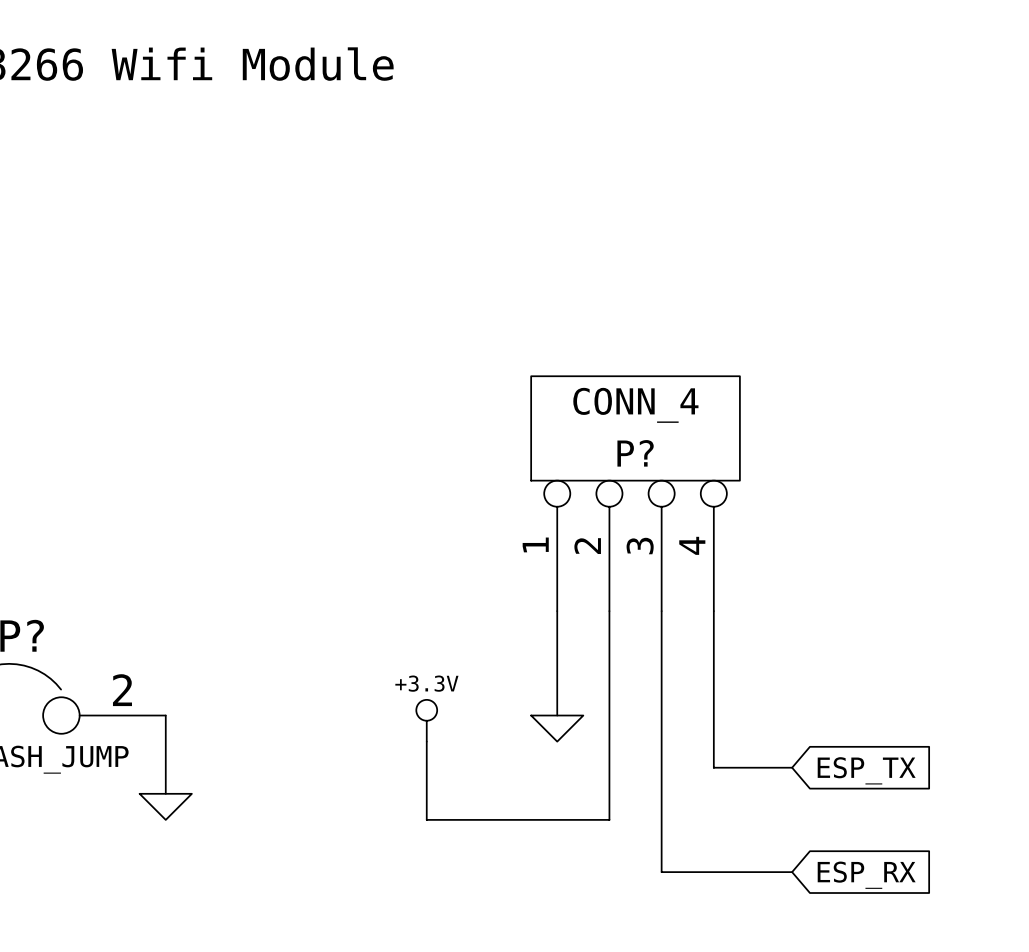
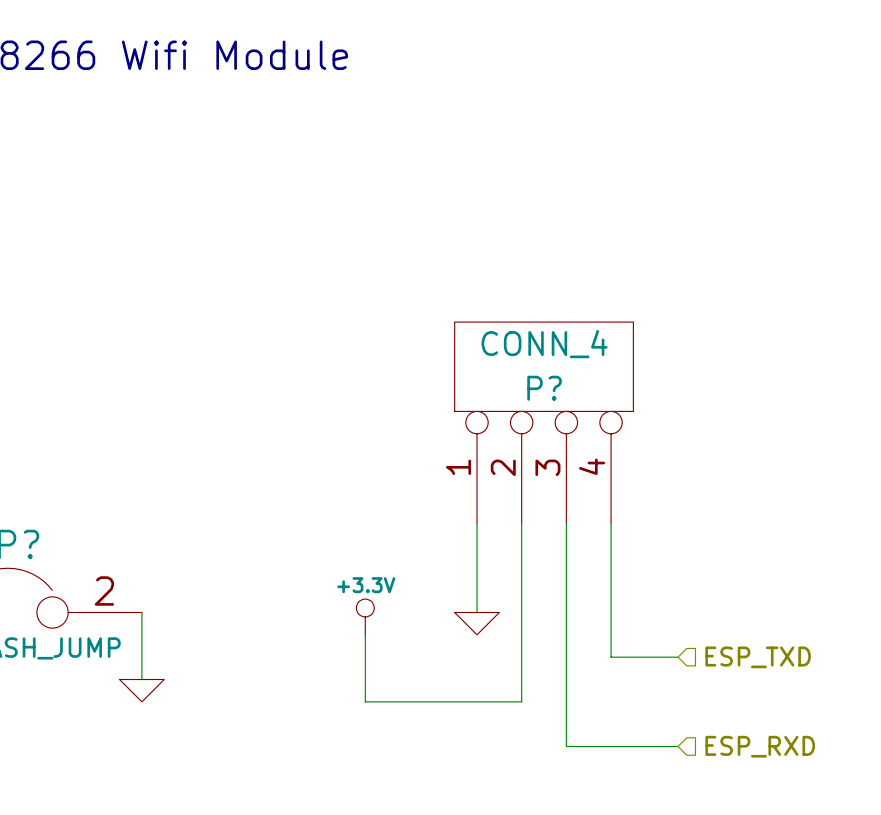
global label: ESP_TX (866, 770) -> none
hierarchical label: none -> ESP_TXD (758, 657)
hierarchical label: none -> ESP_RXD (760, 746)
global label: ESP_RX (866, 875) -> none

